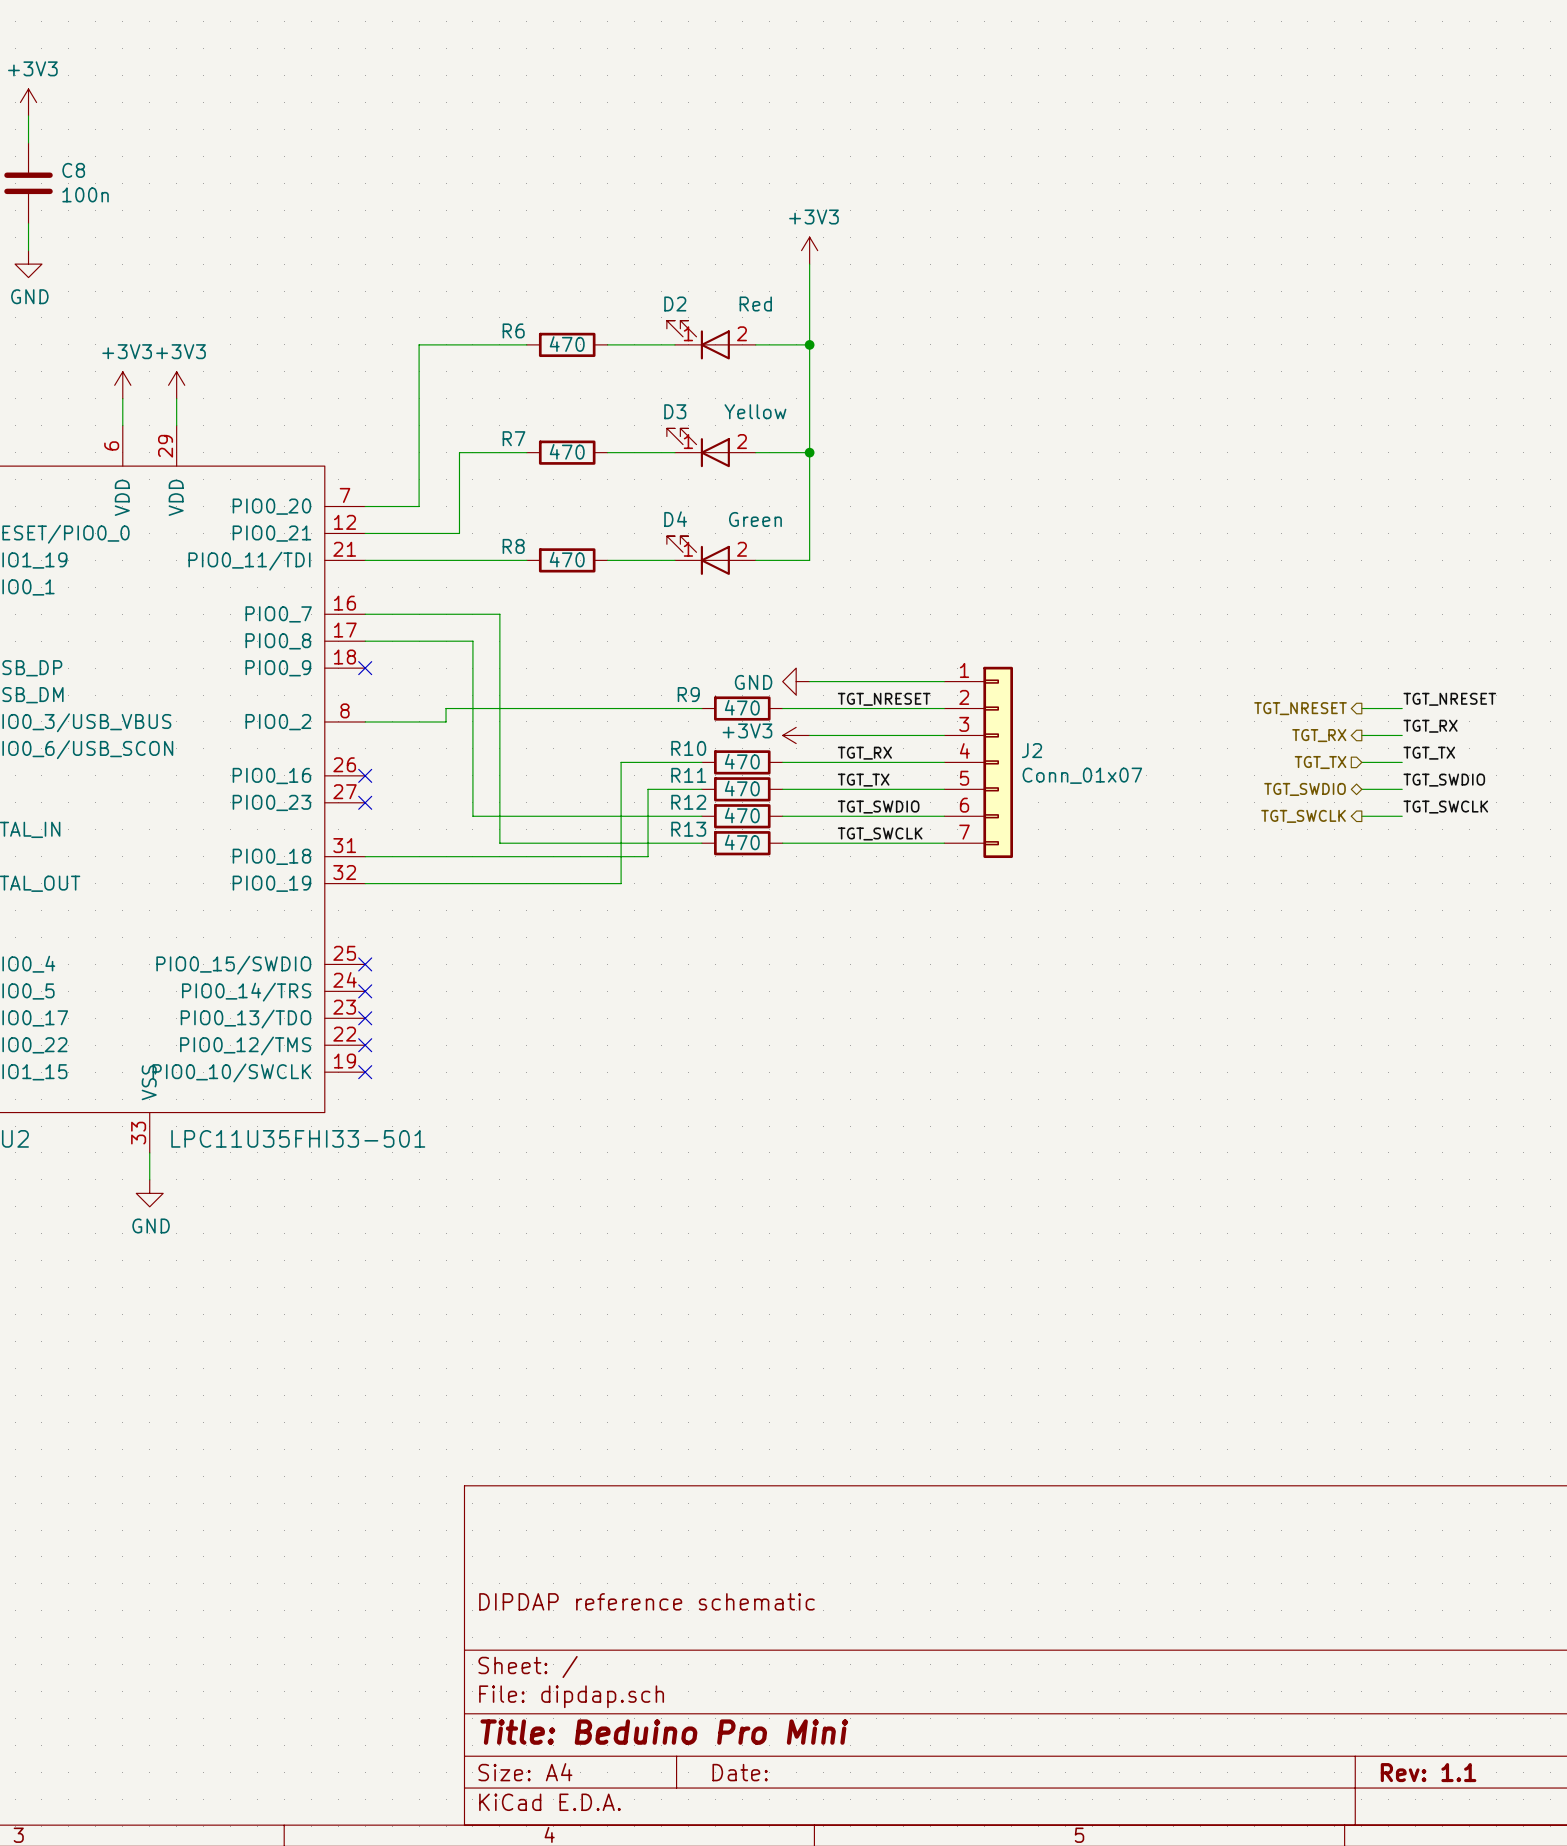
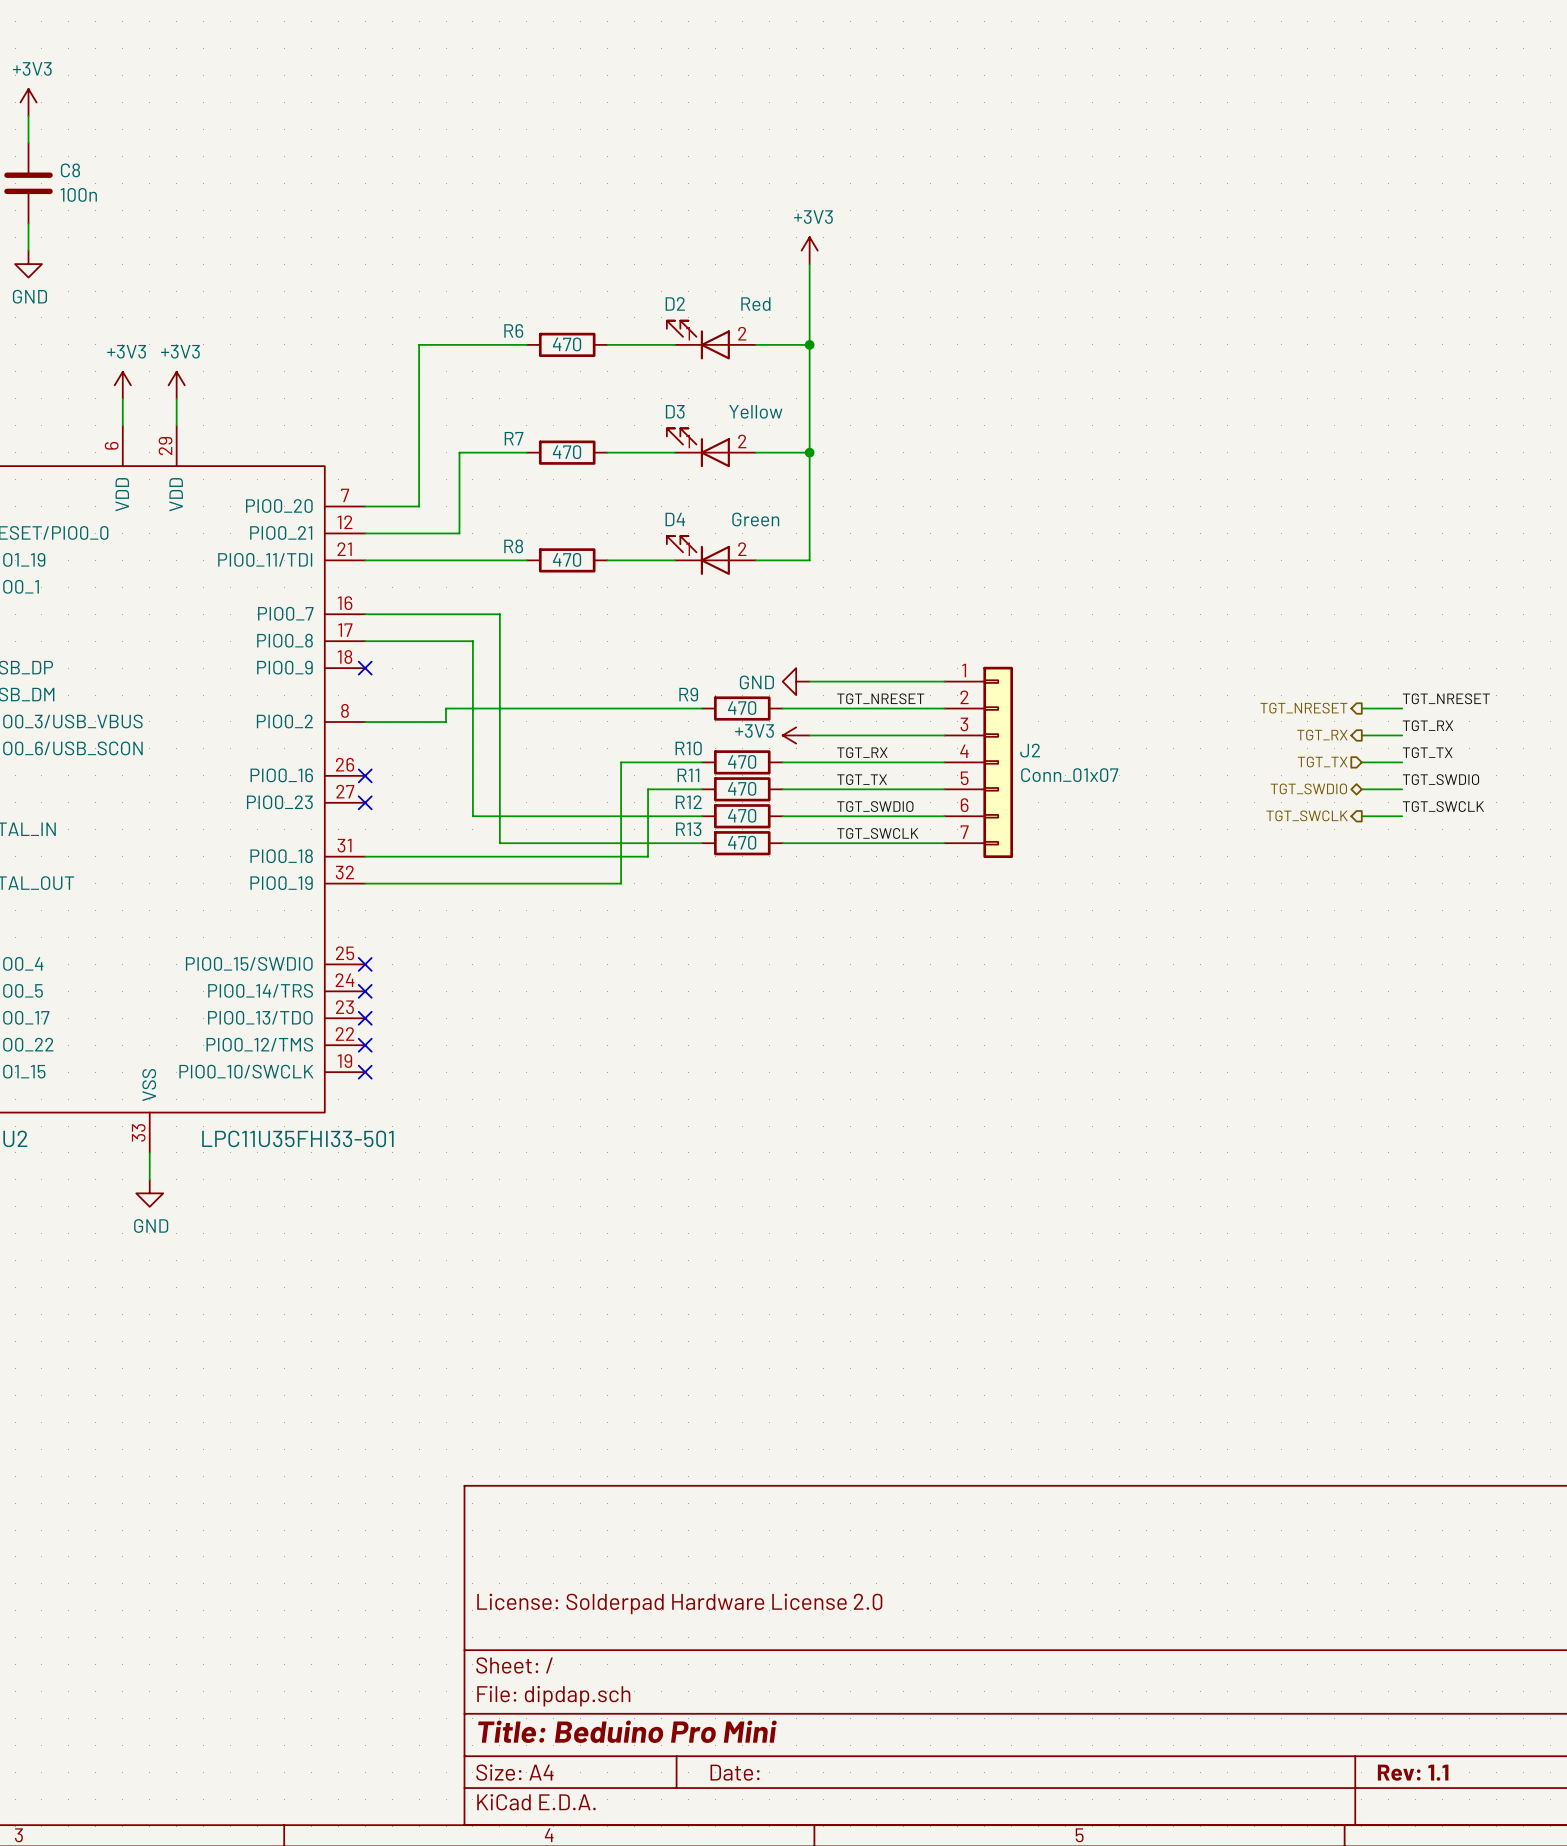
title block: DIPDAP reference schematic (646, 1601) -> License: Solderpad Hardware License 2.0 (679, 1603)

